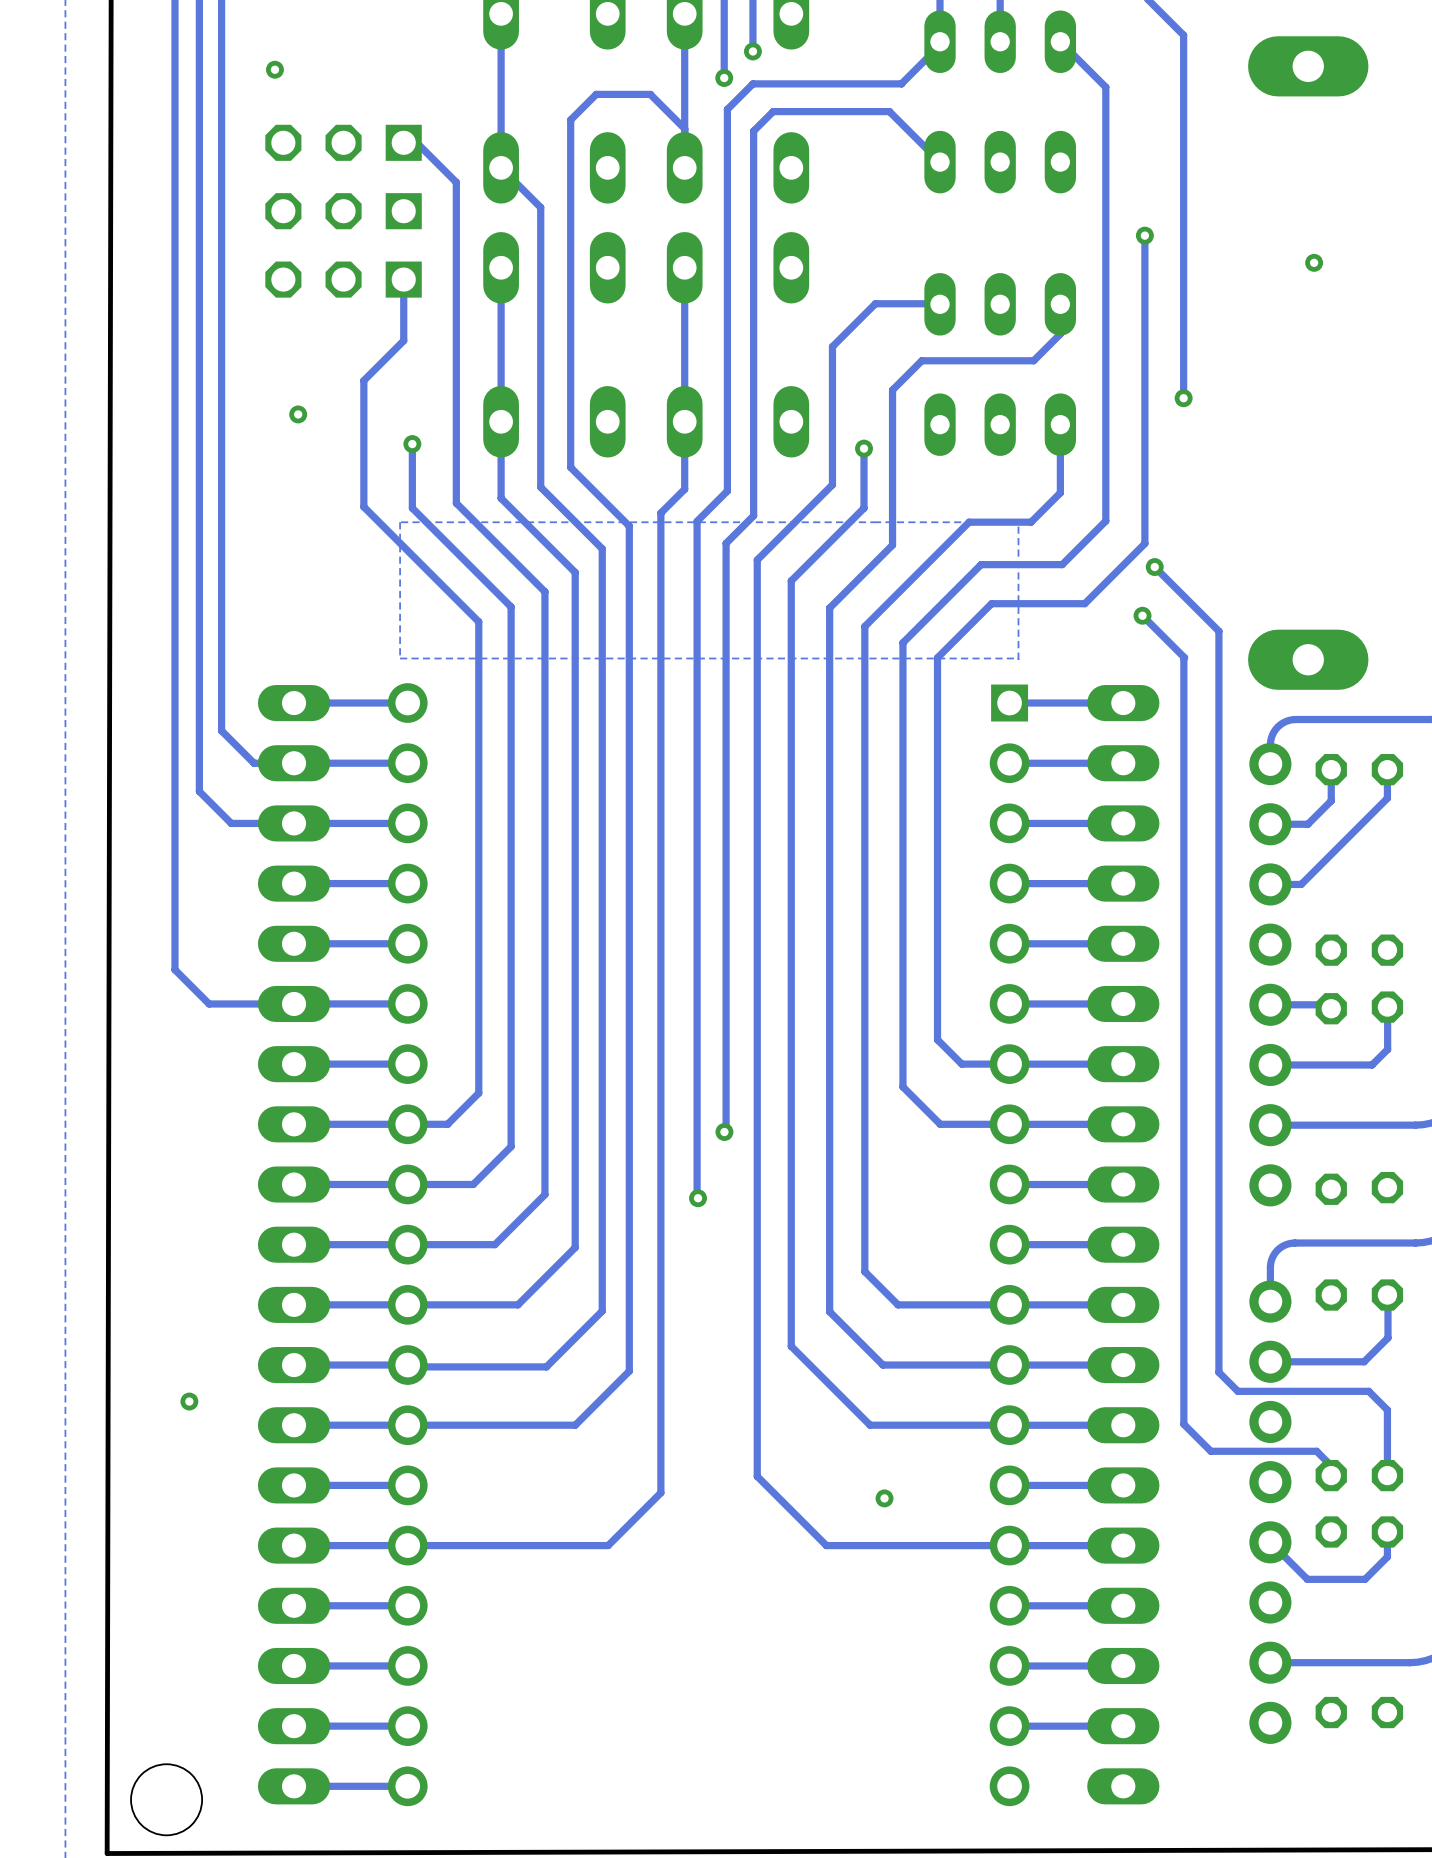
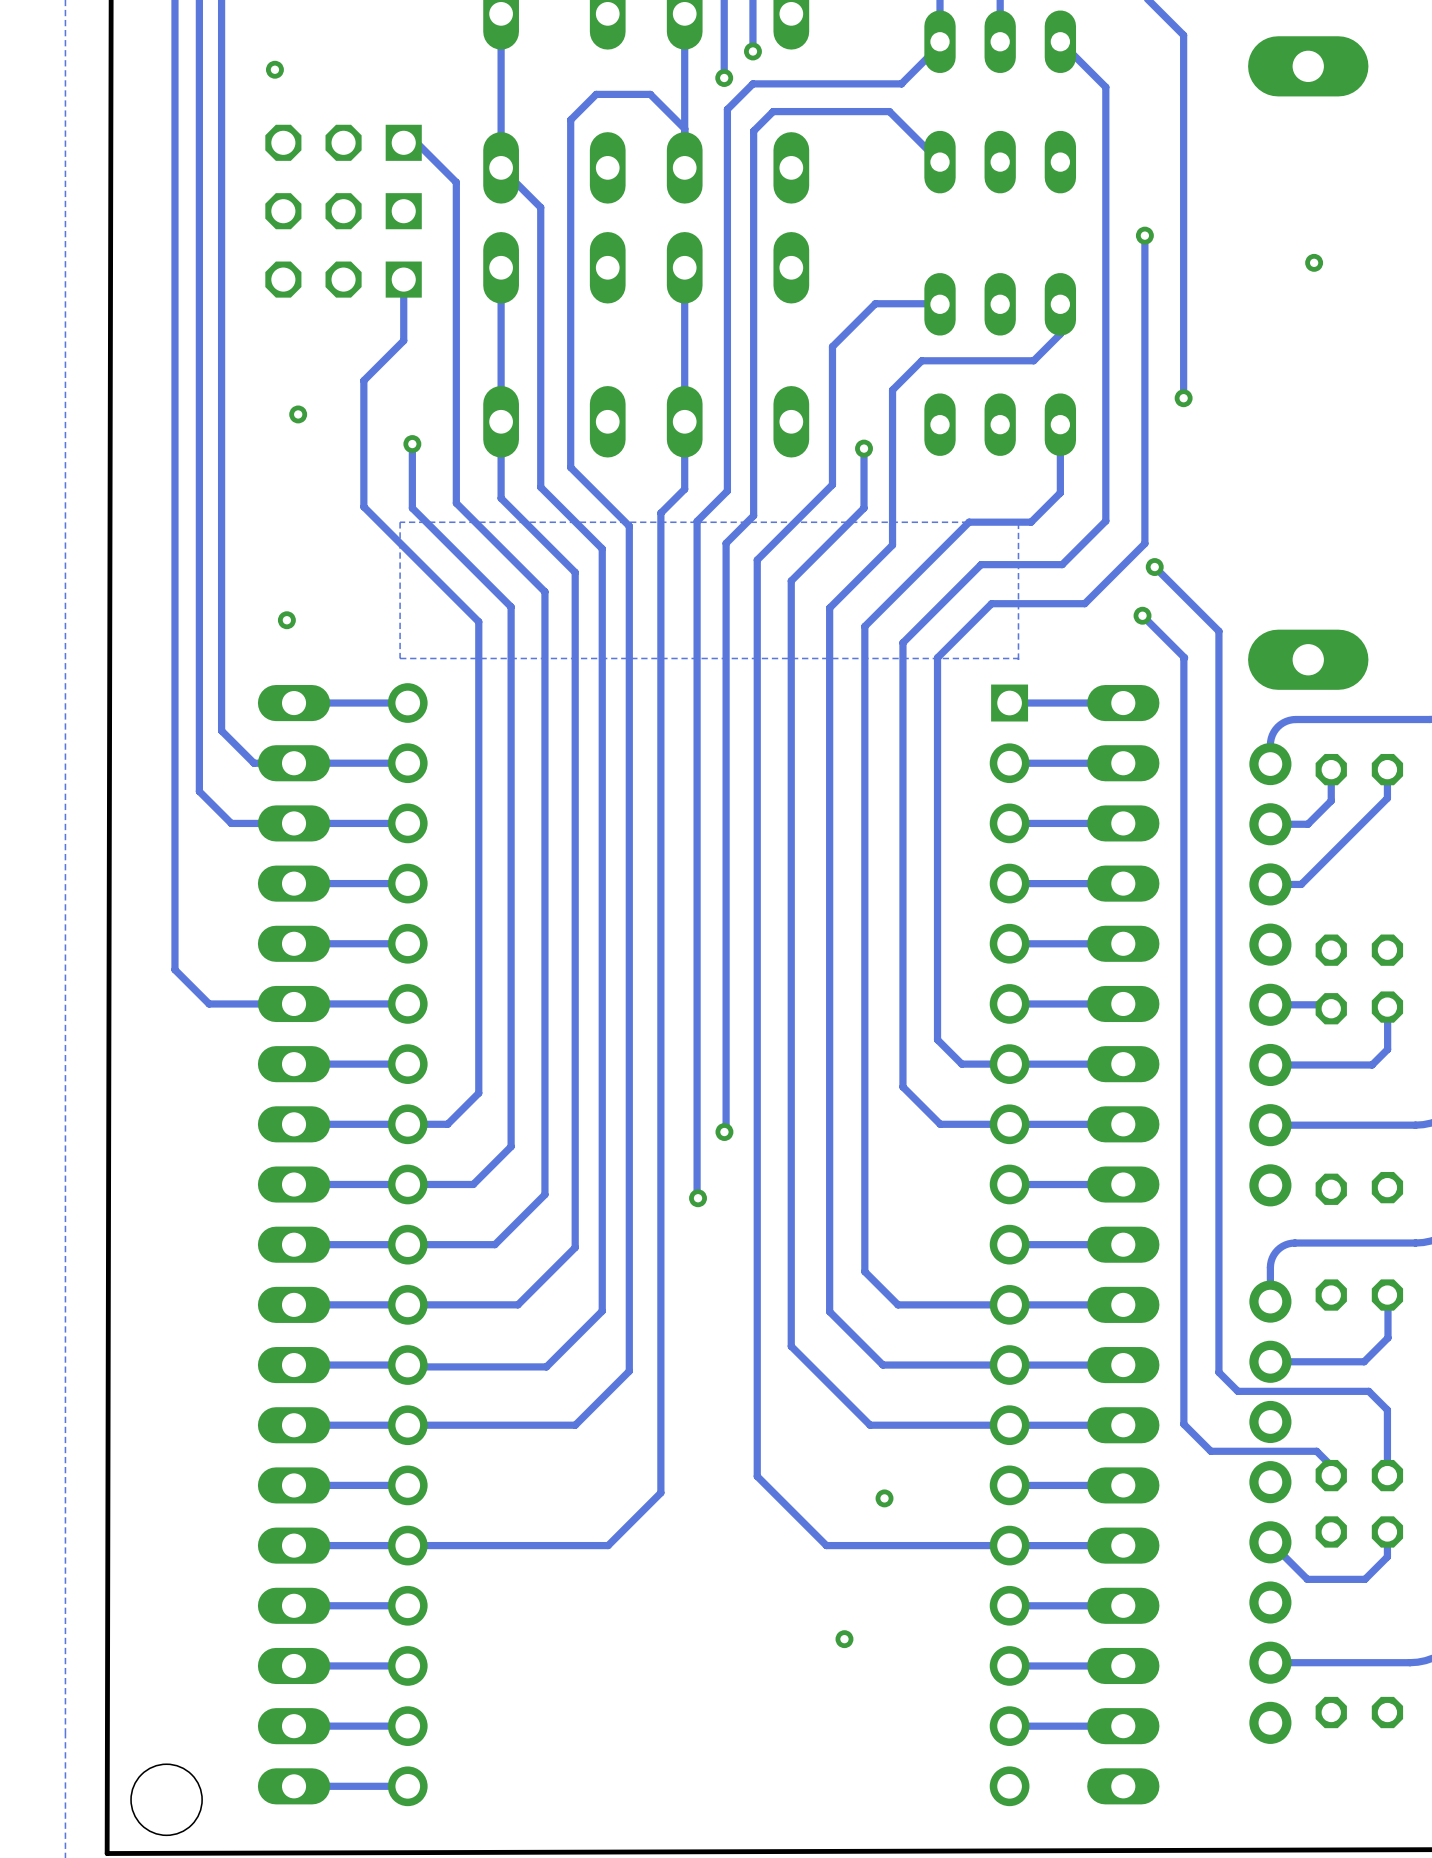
via: none -> (286, 620)
via: (189, 1401) -> none
via: none -> (844, 1639)

